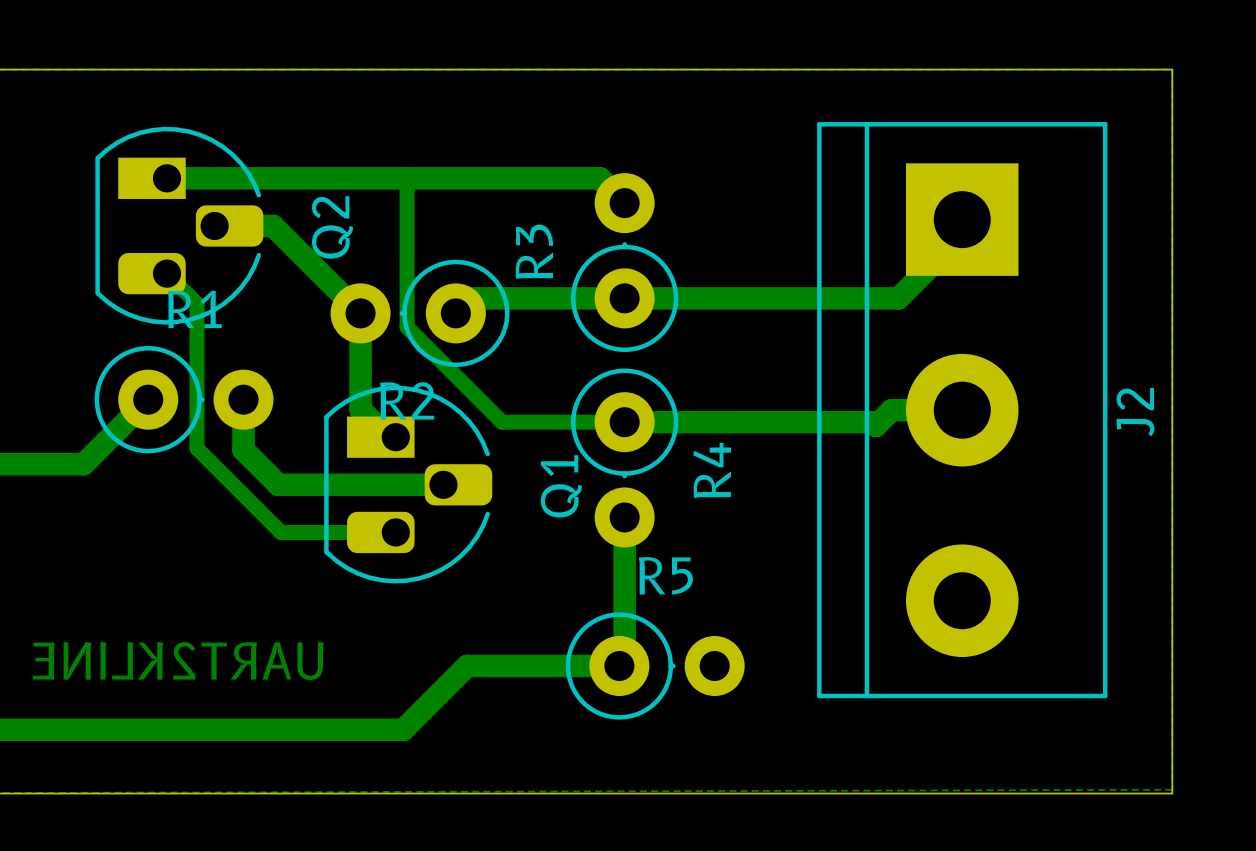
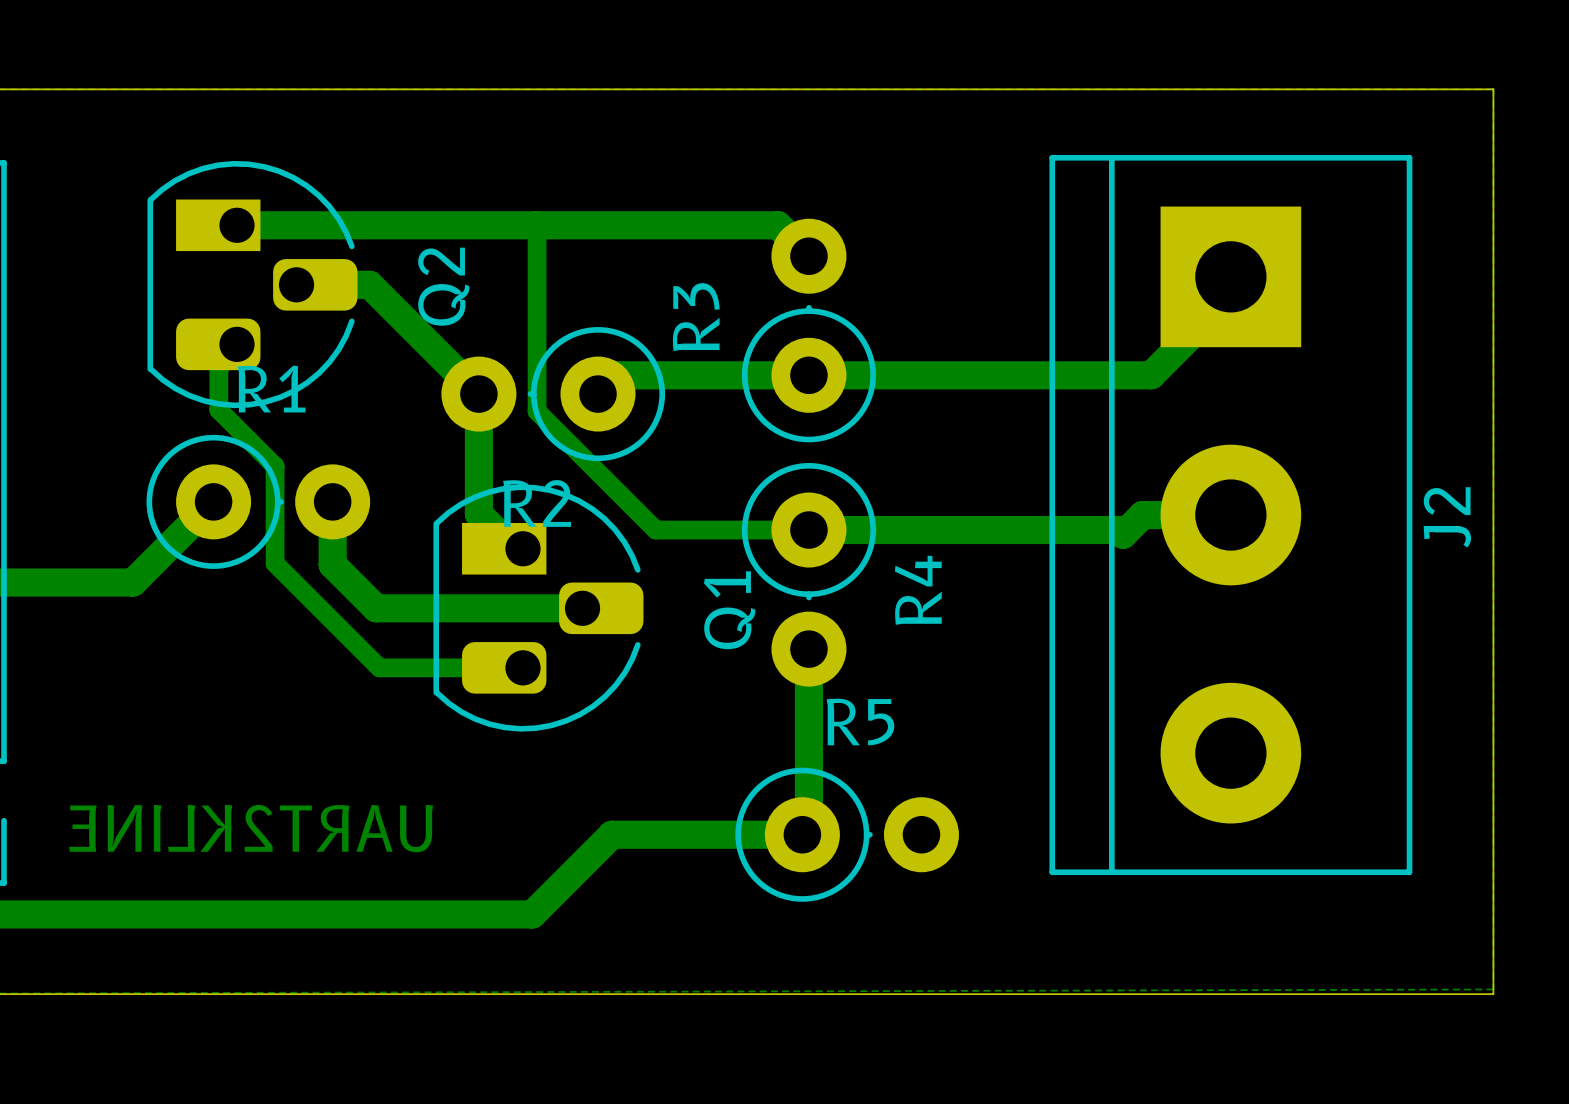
bottom track: (166, 273) (197, 303) (197, 448) -> (237, 344) (237, 349) (218, 367) (218, 410) (275, 466) (275, 563)

